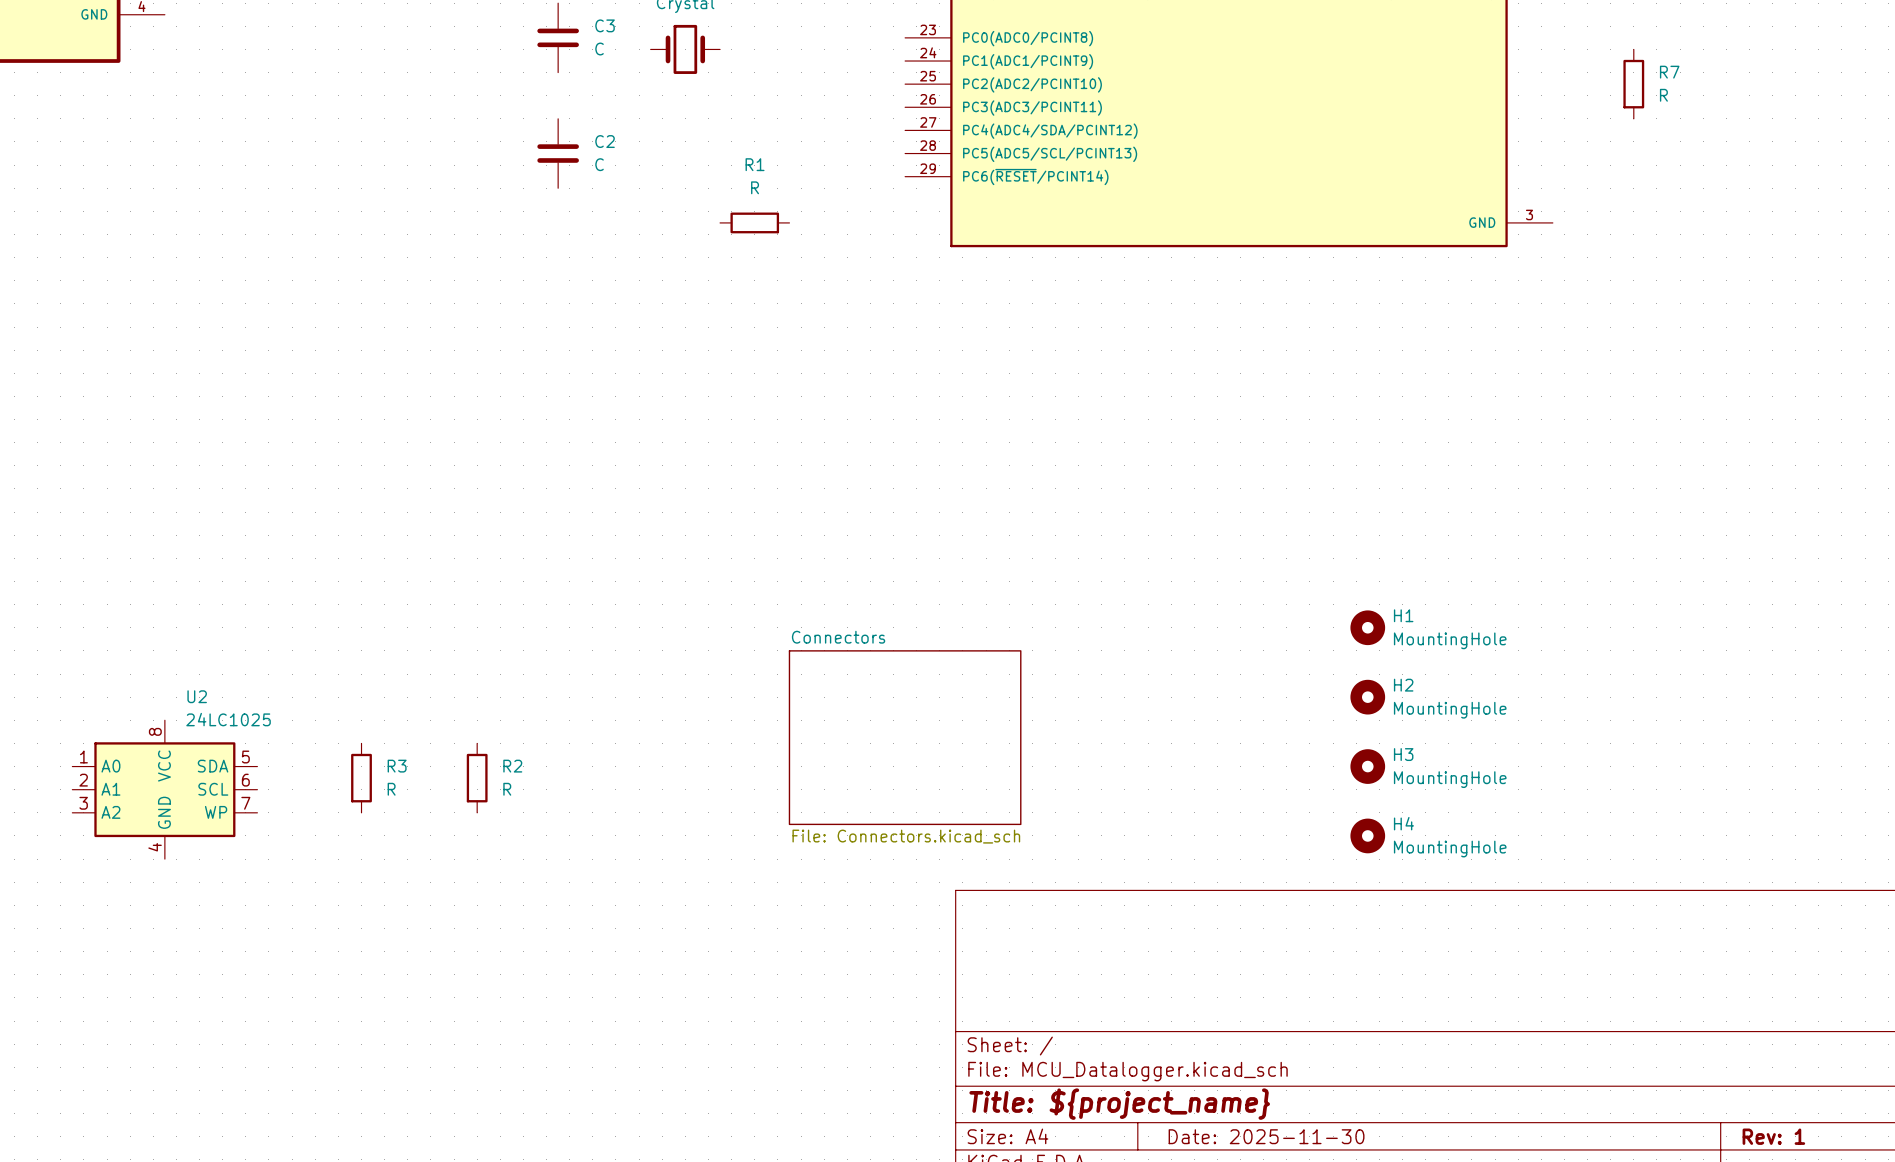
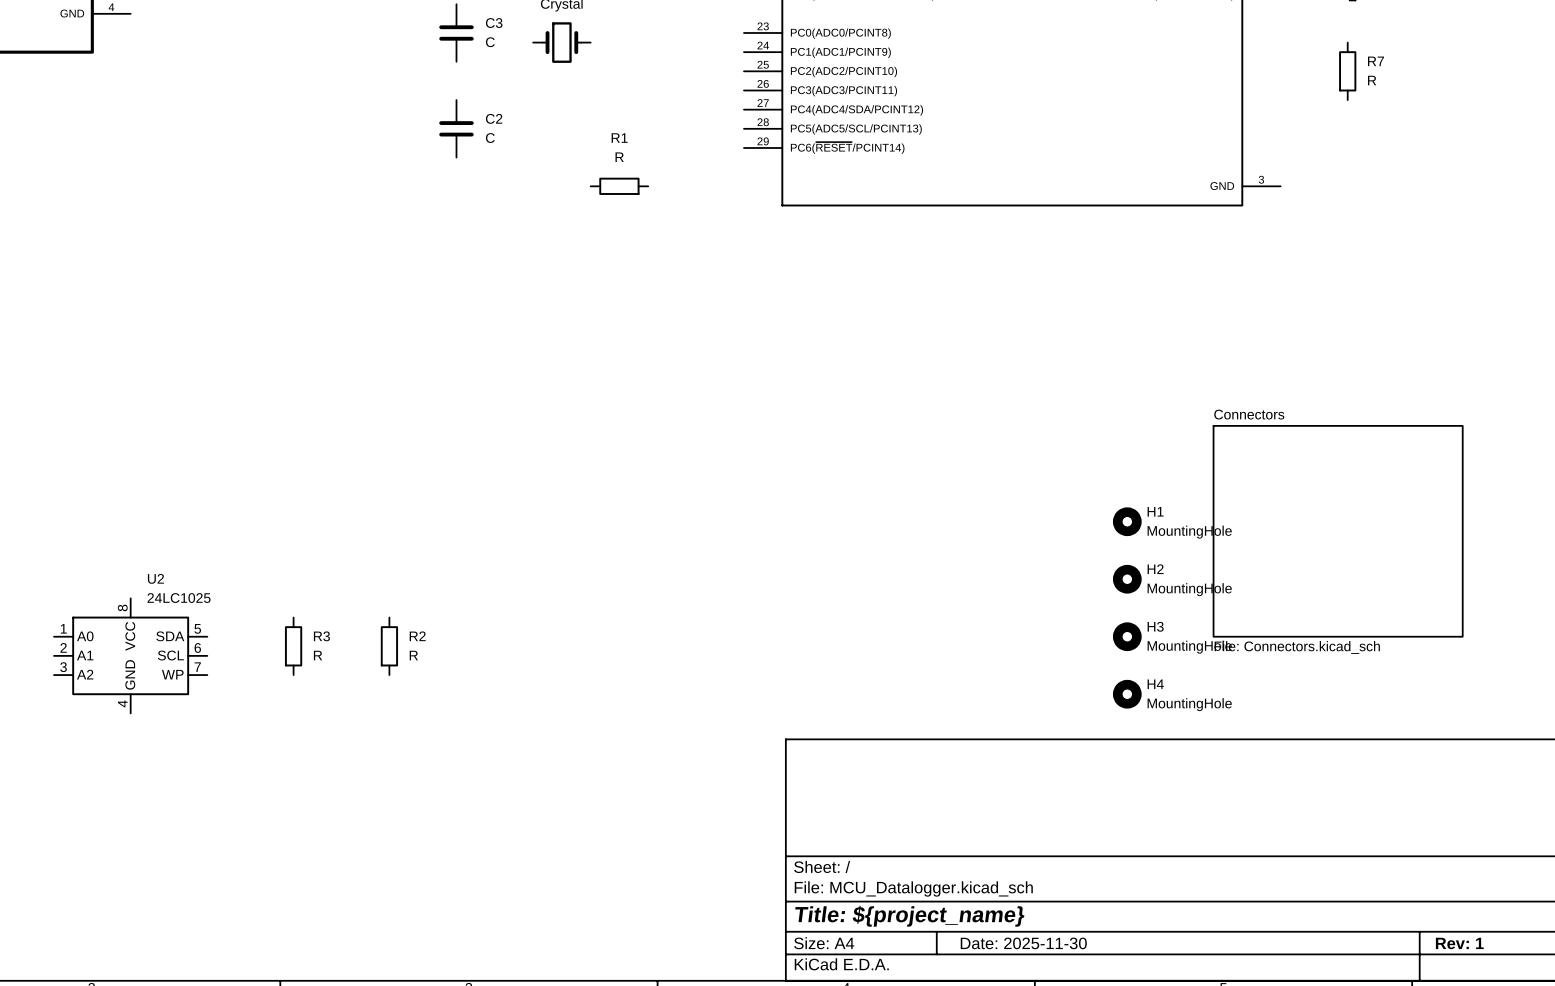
sheet Connectors: none -> File: Connectors.kicad_sch (1338, 531)
sheet Connectors: File: Connectors.kicad_sch (905, 737) -> none

